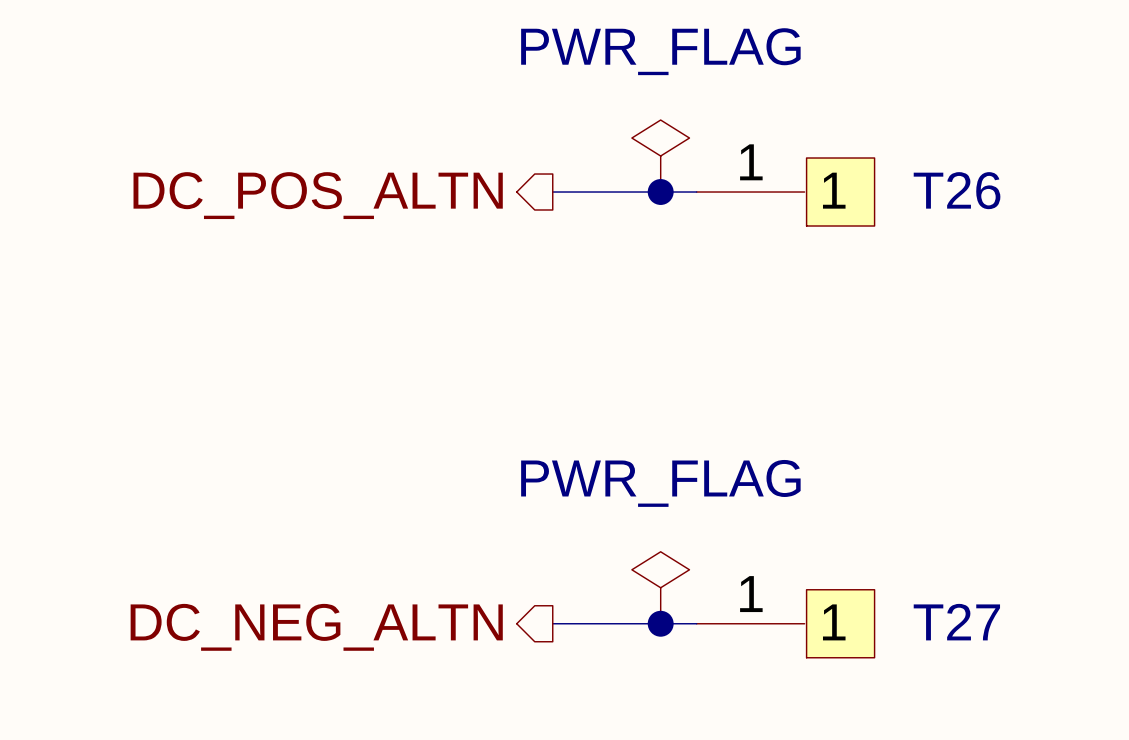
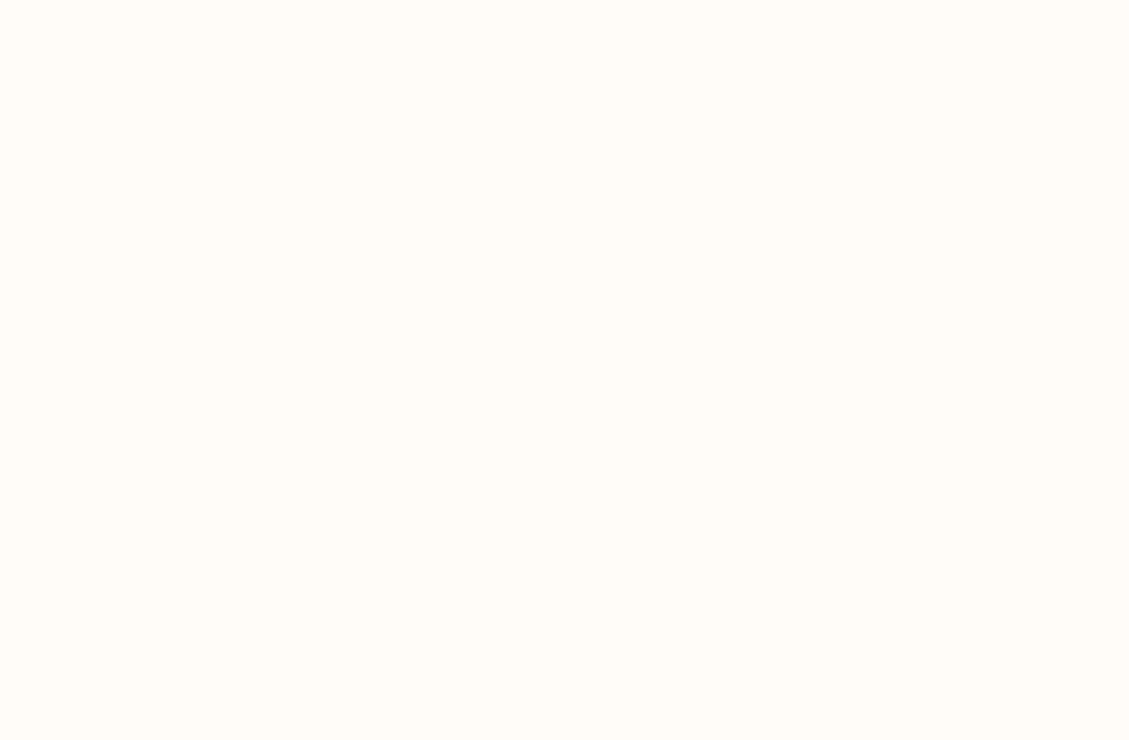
power symbol: PWR_FLAG (660, 156) -> none
wire: (552, 192) (696, 192) -> none
junction: (660, 192) -> none
T26: (785, 192) -> none
hierarchical label: DC_POS_ALTN (318, 195) -> none
power symbol: PWR_FLAG (660, 587) -> none
wire: (552, 623) (696, 623) -> none
junction: (660, 623) -> none
T27: (785, 623) -> none
hierarchical label: DC_NEG_ALTN (316, 627) -> none

